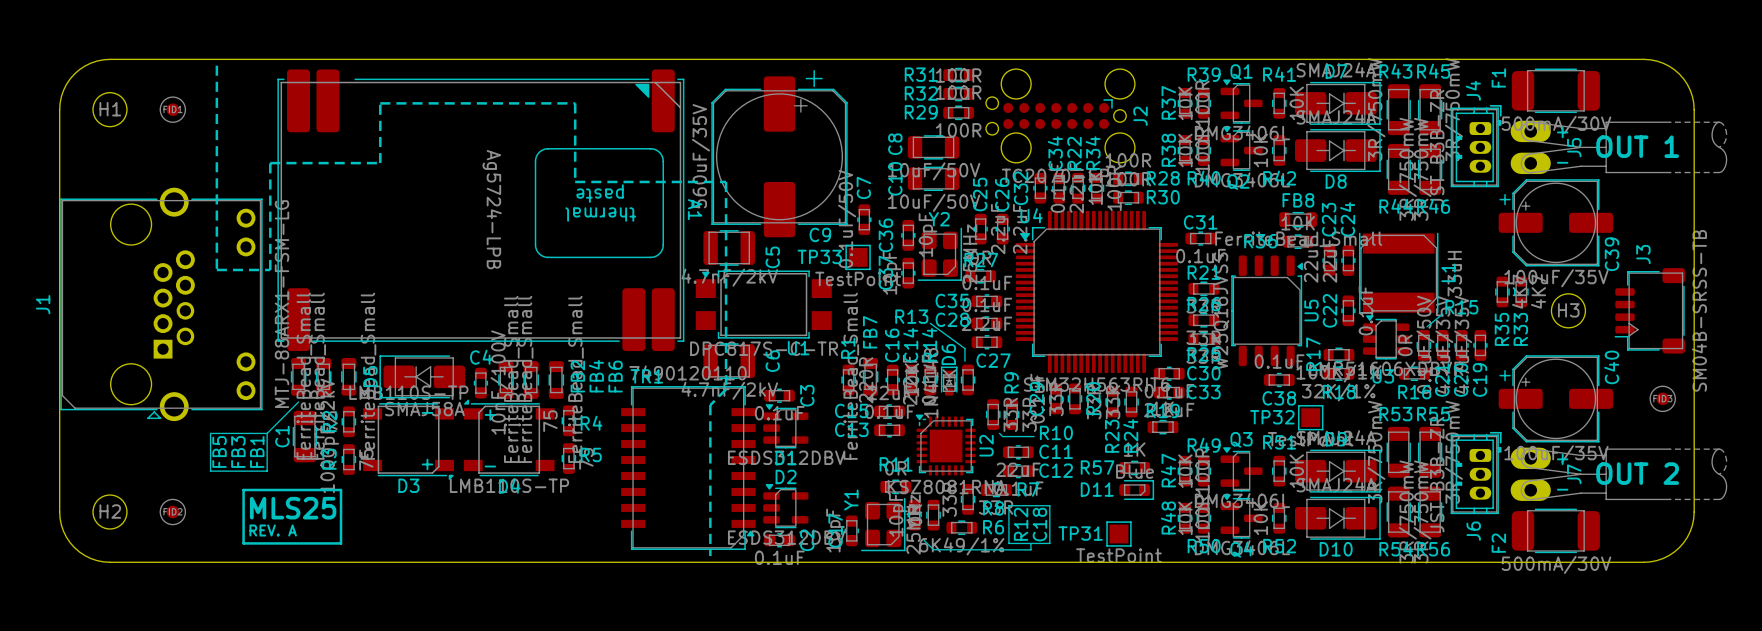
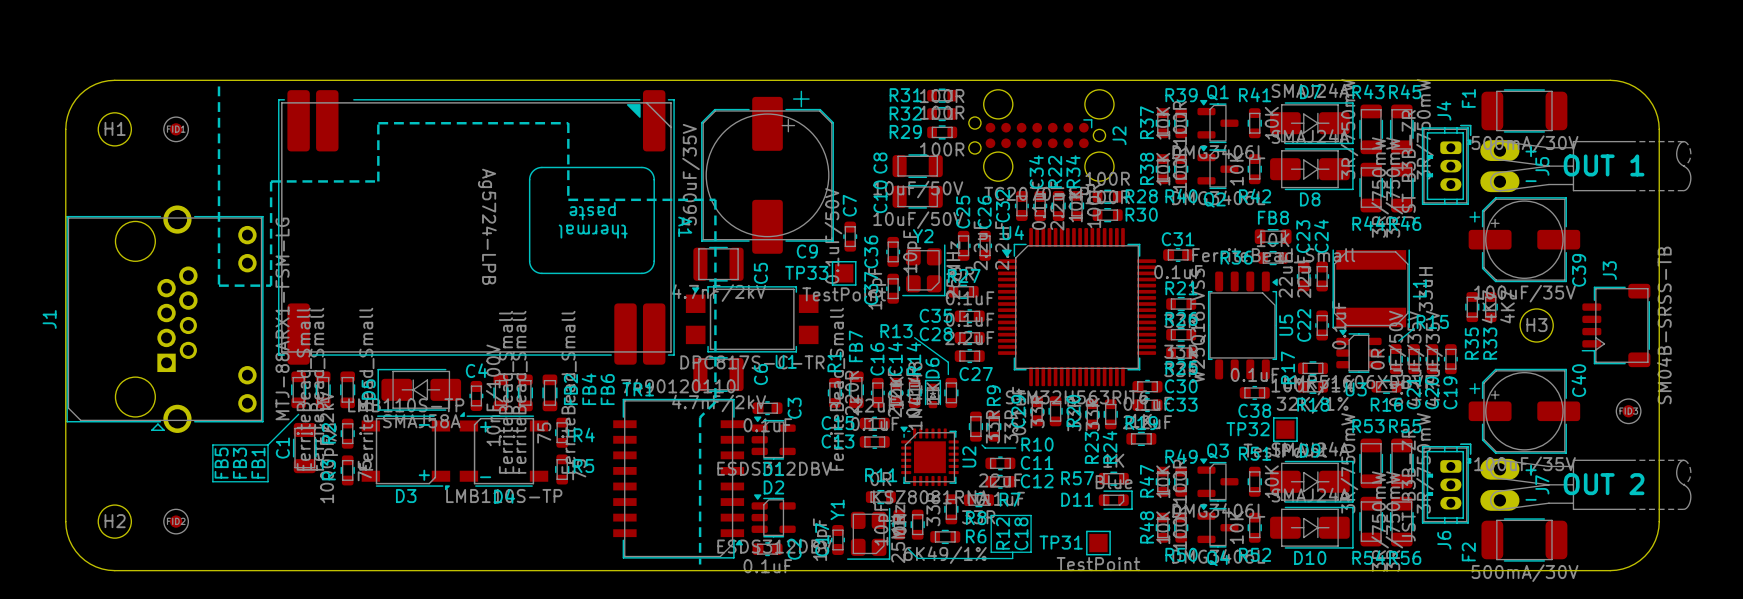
line: (243, 490) (341, 490) (341, 543) (243, 543) (243, 490) -> none
text: MLS25 (293, 508) -> none
text: REV. A (273, 530) -> none

